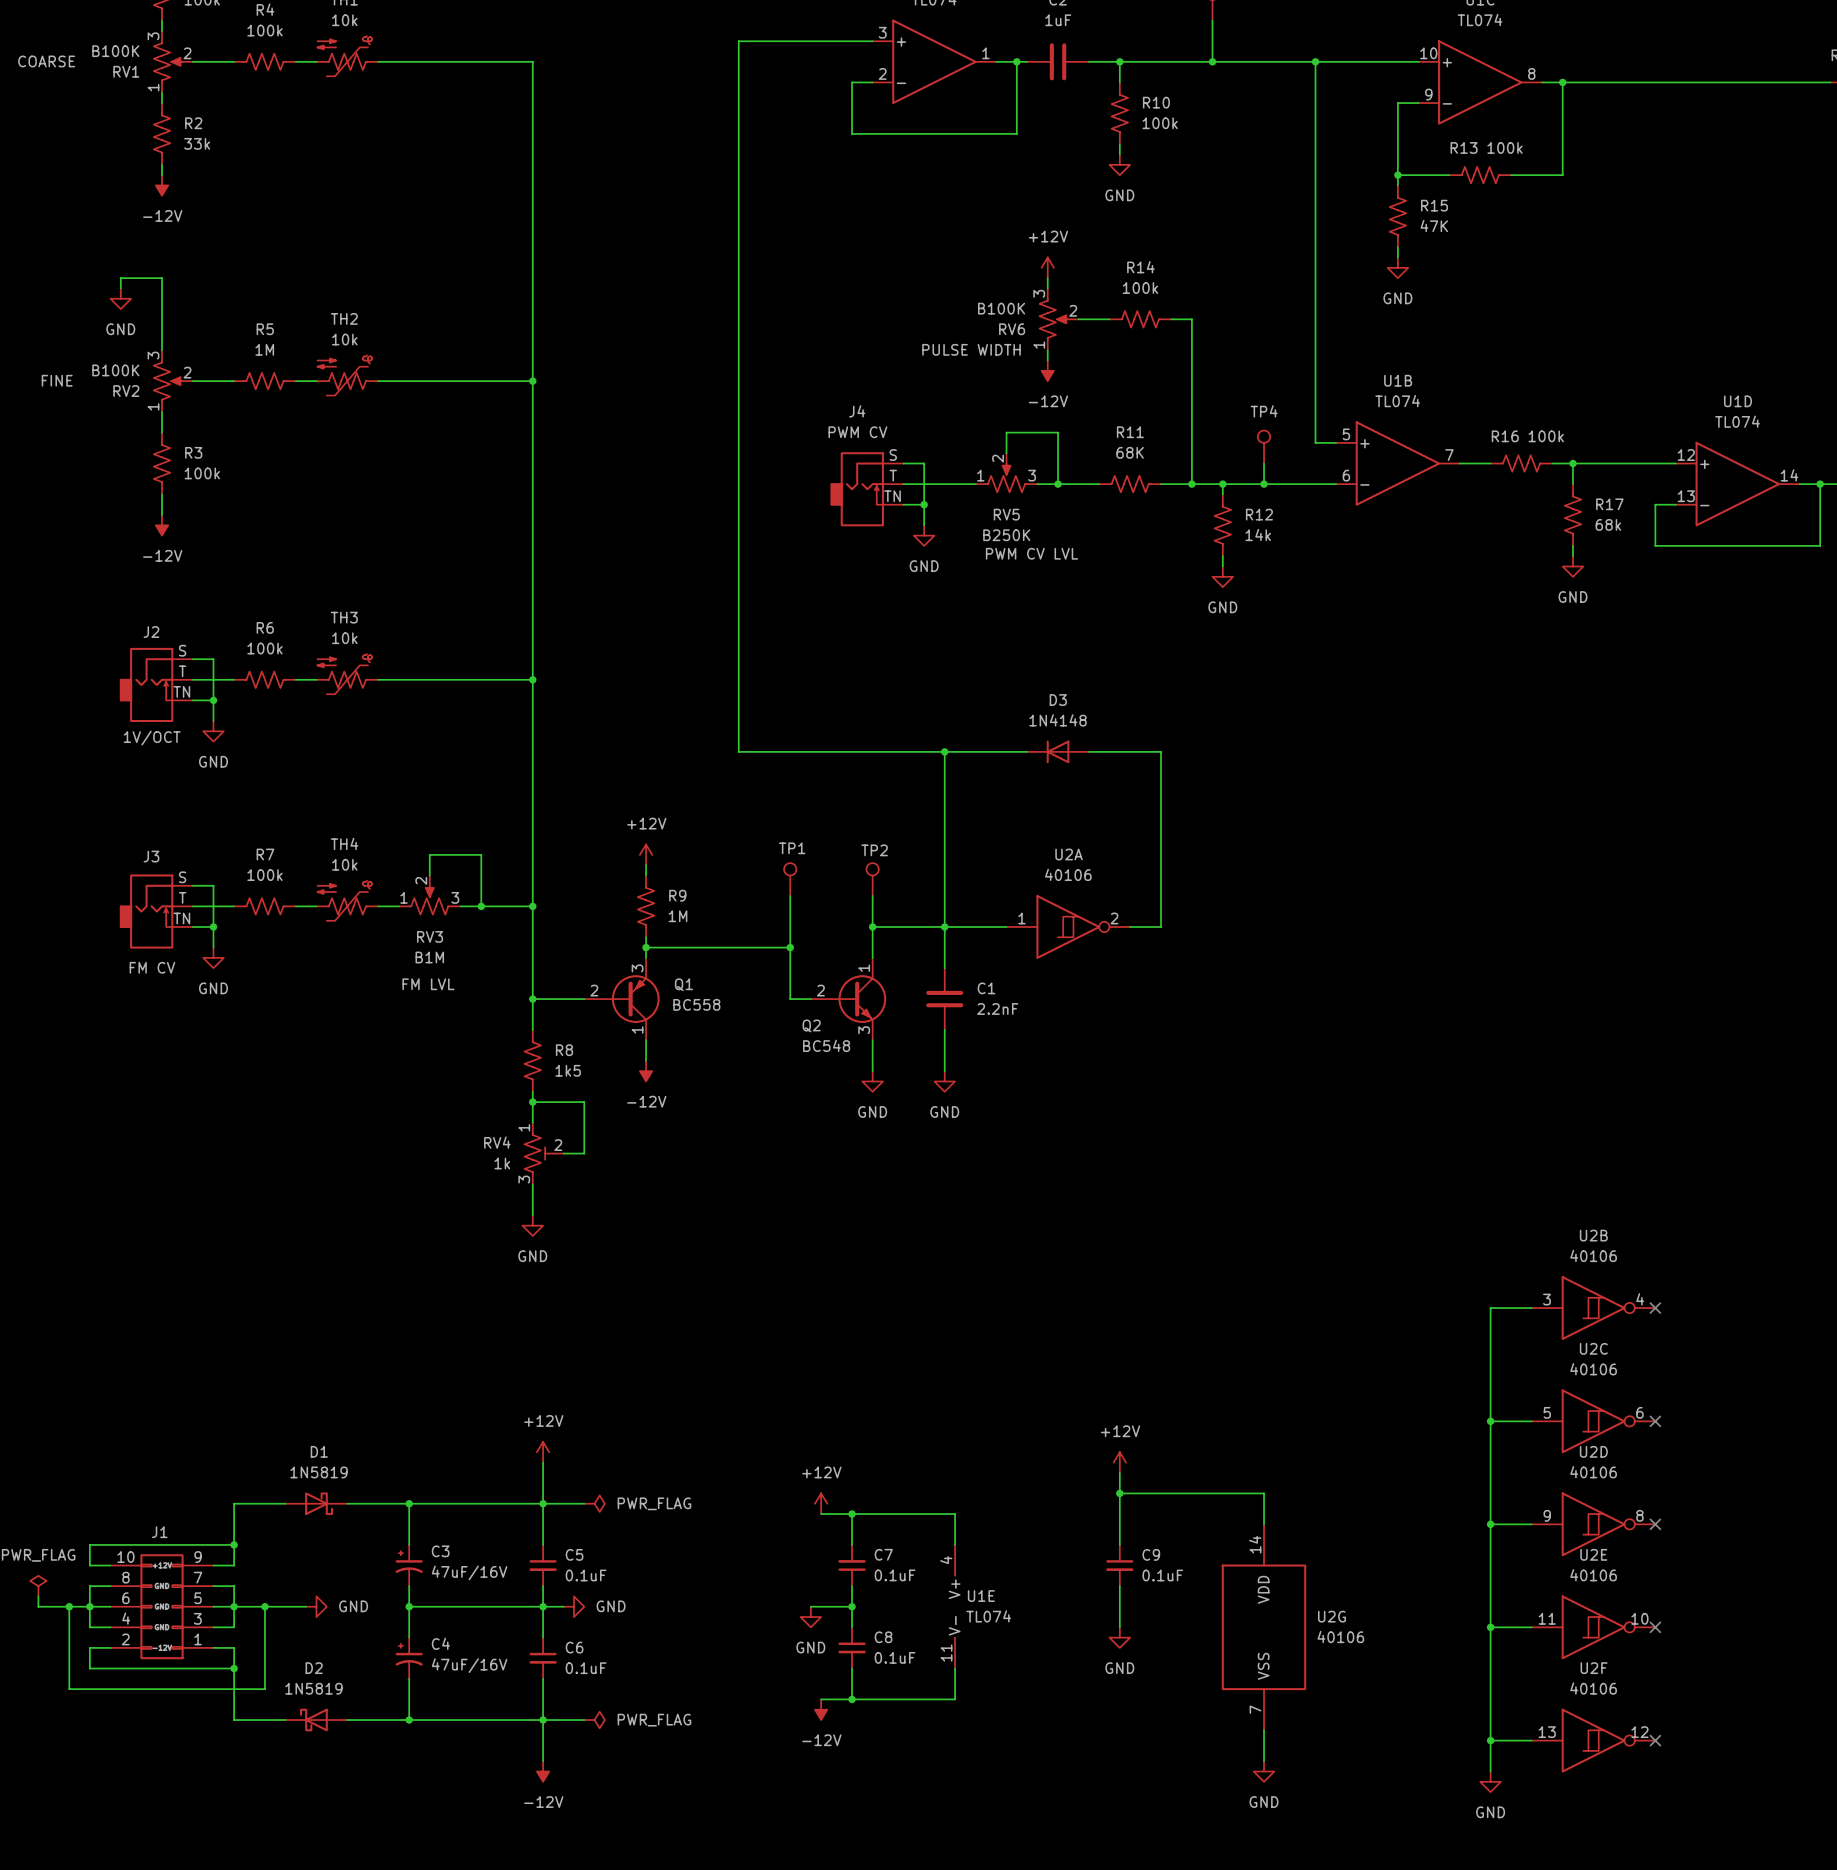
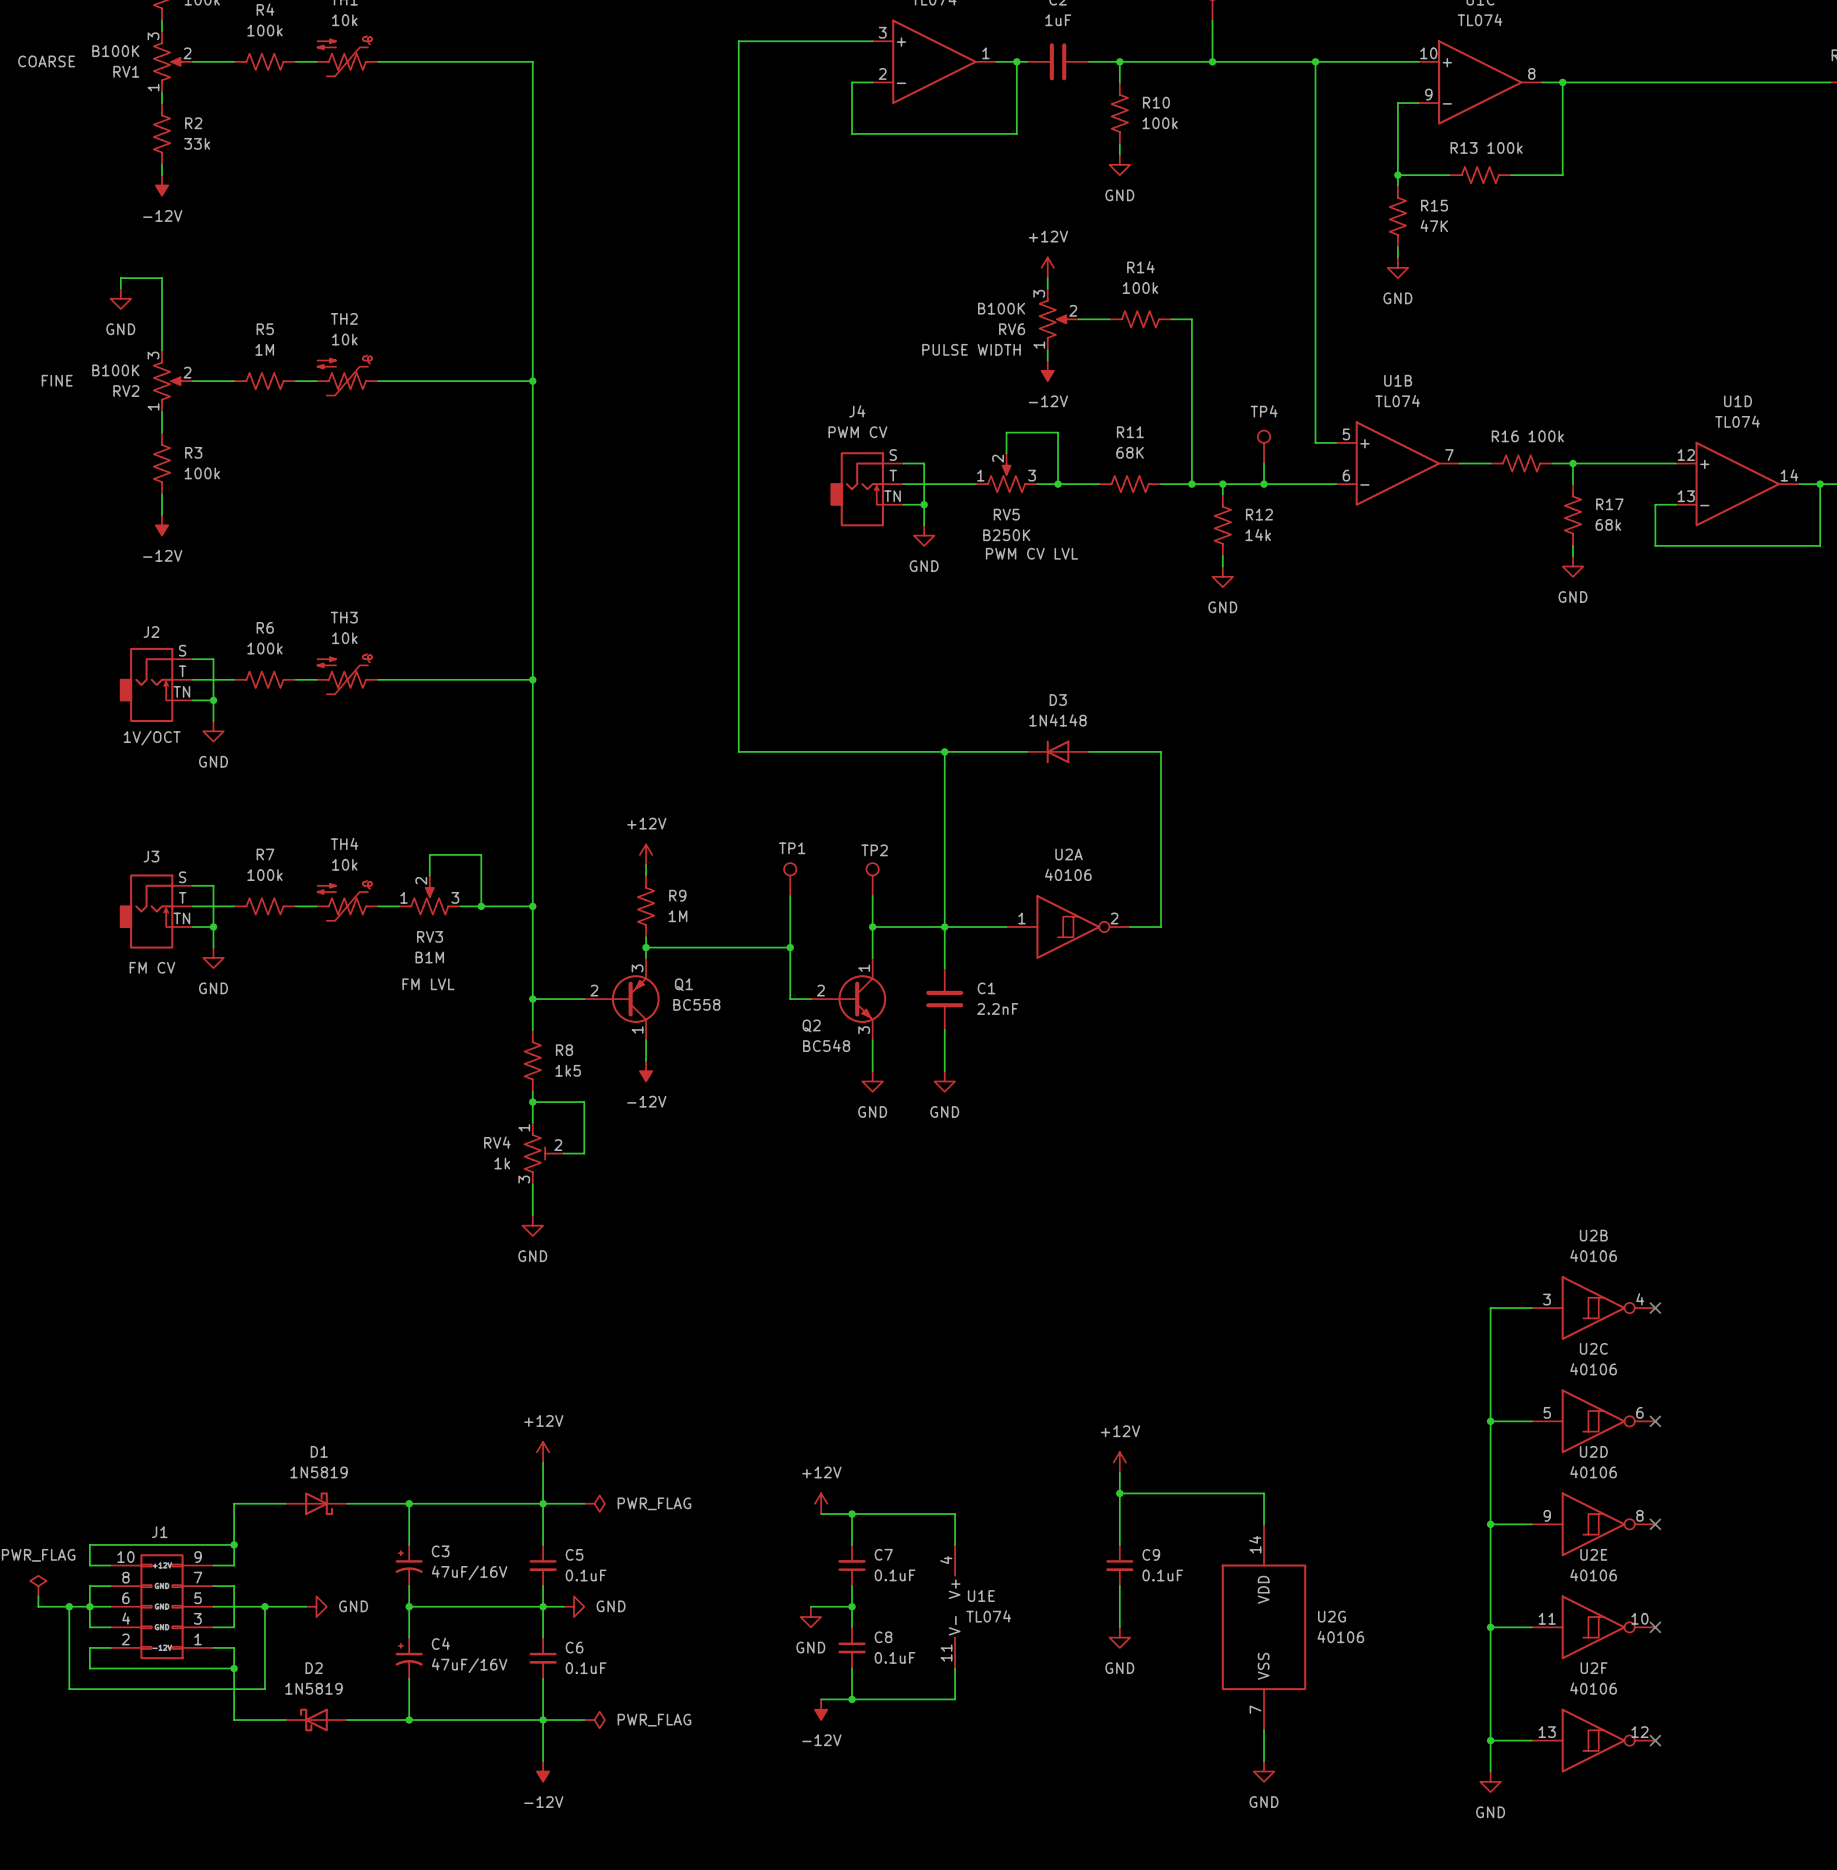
junction: (234, 1606) -> none

